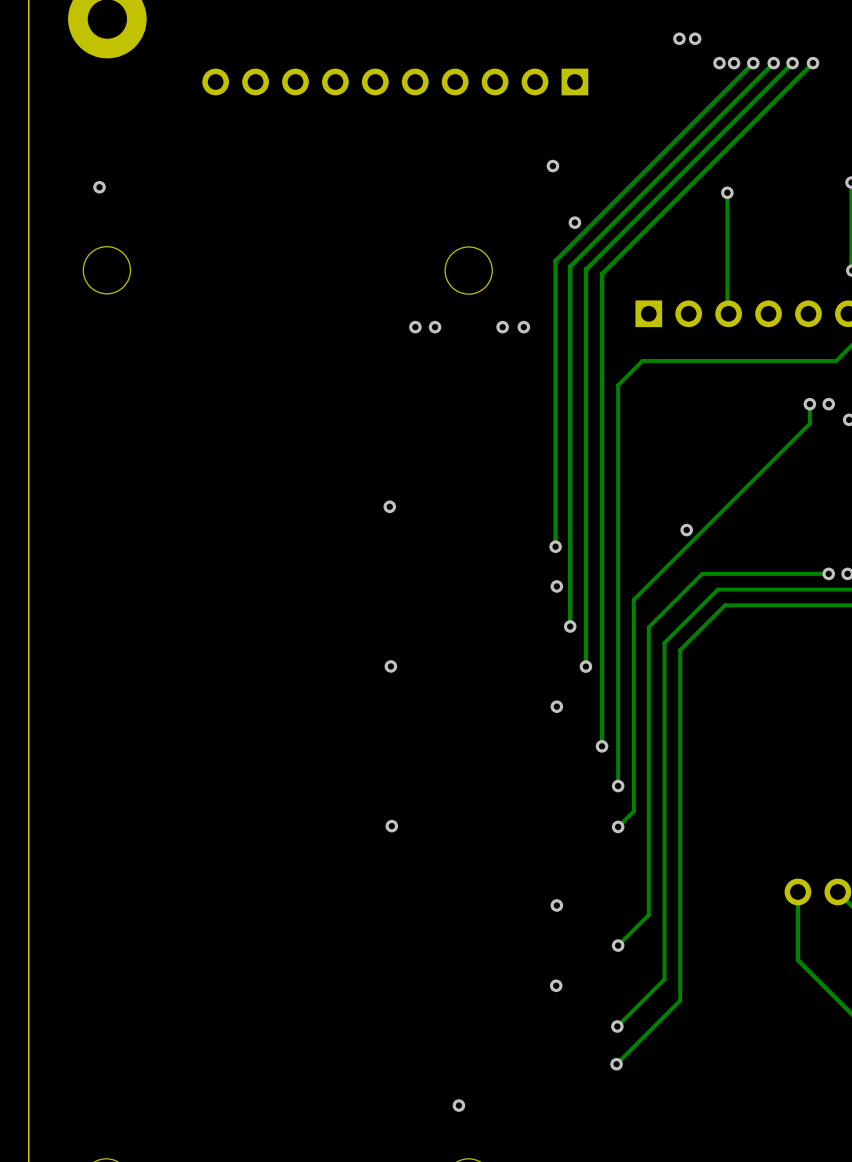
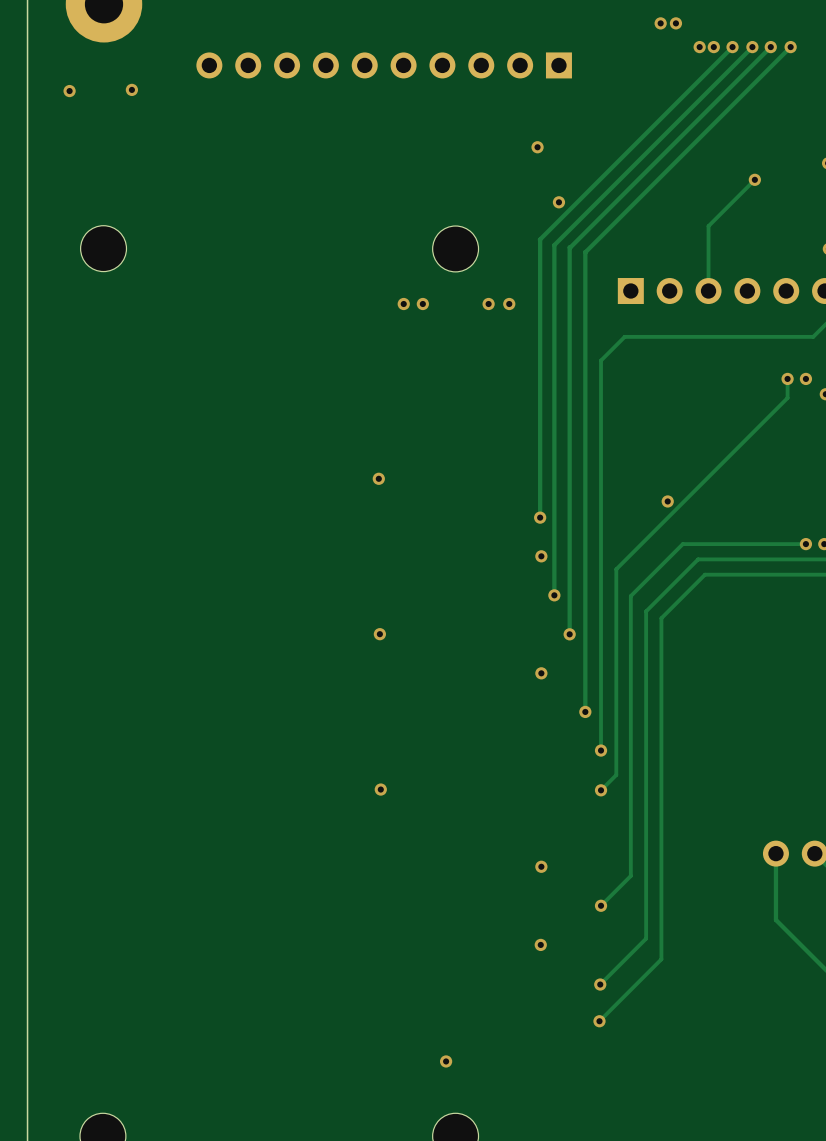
via: none -> (131, 89)
via: none -> (69, 91)
via: (99, 187) -> none
track: (727, 192) (727, 312) -> none
via position: (727, 192) -> (754, 179)
track: none -> (754, 179) (708, 226) (708, 291)

